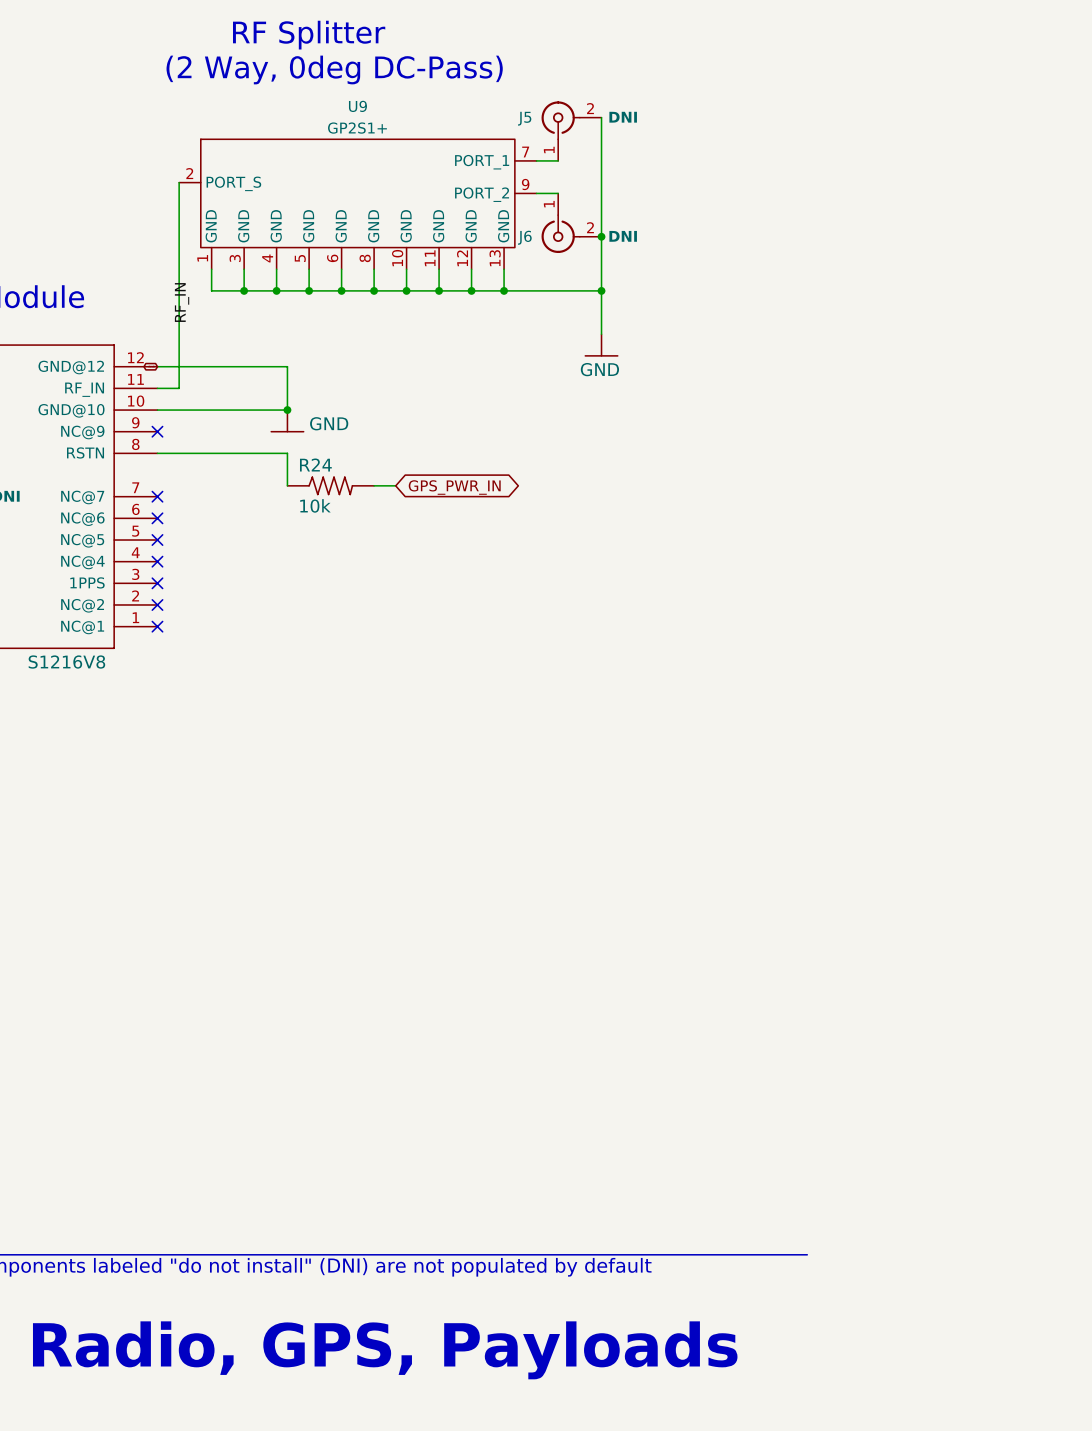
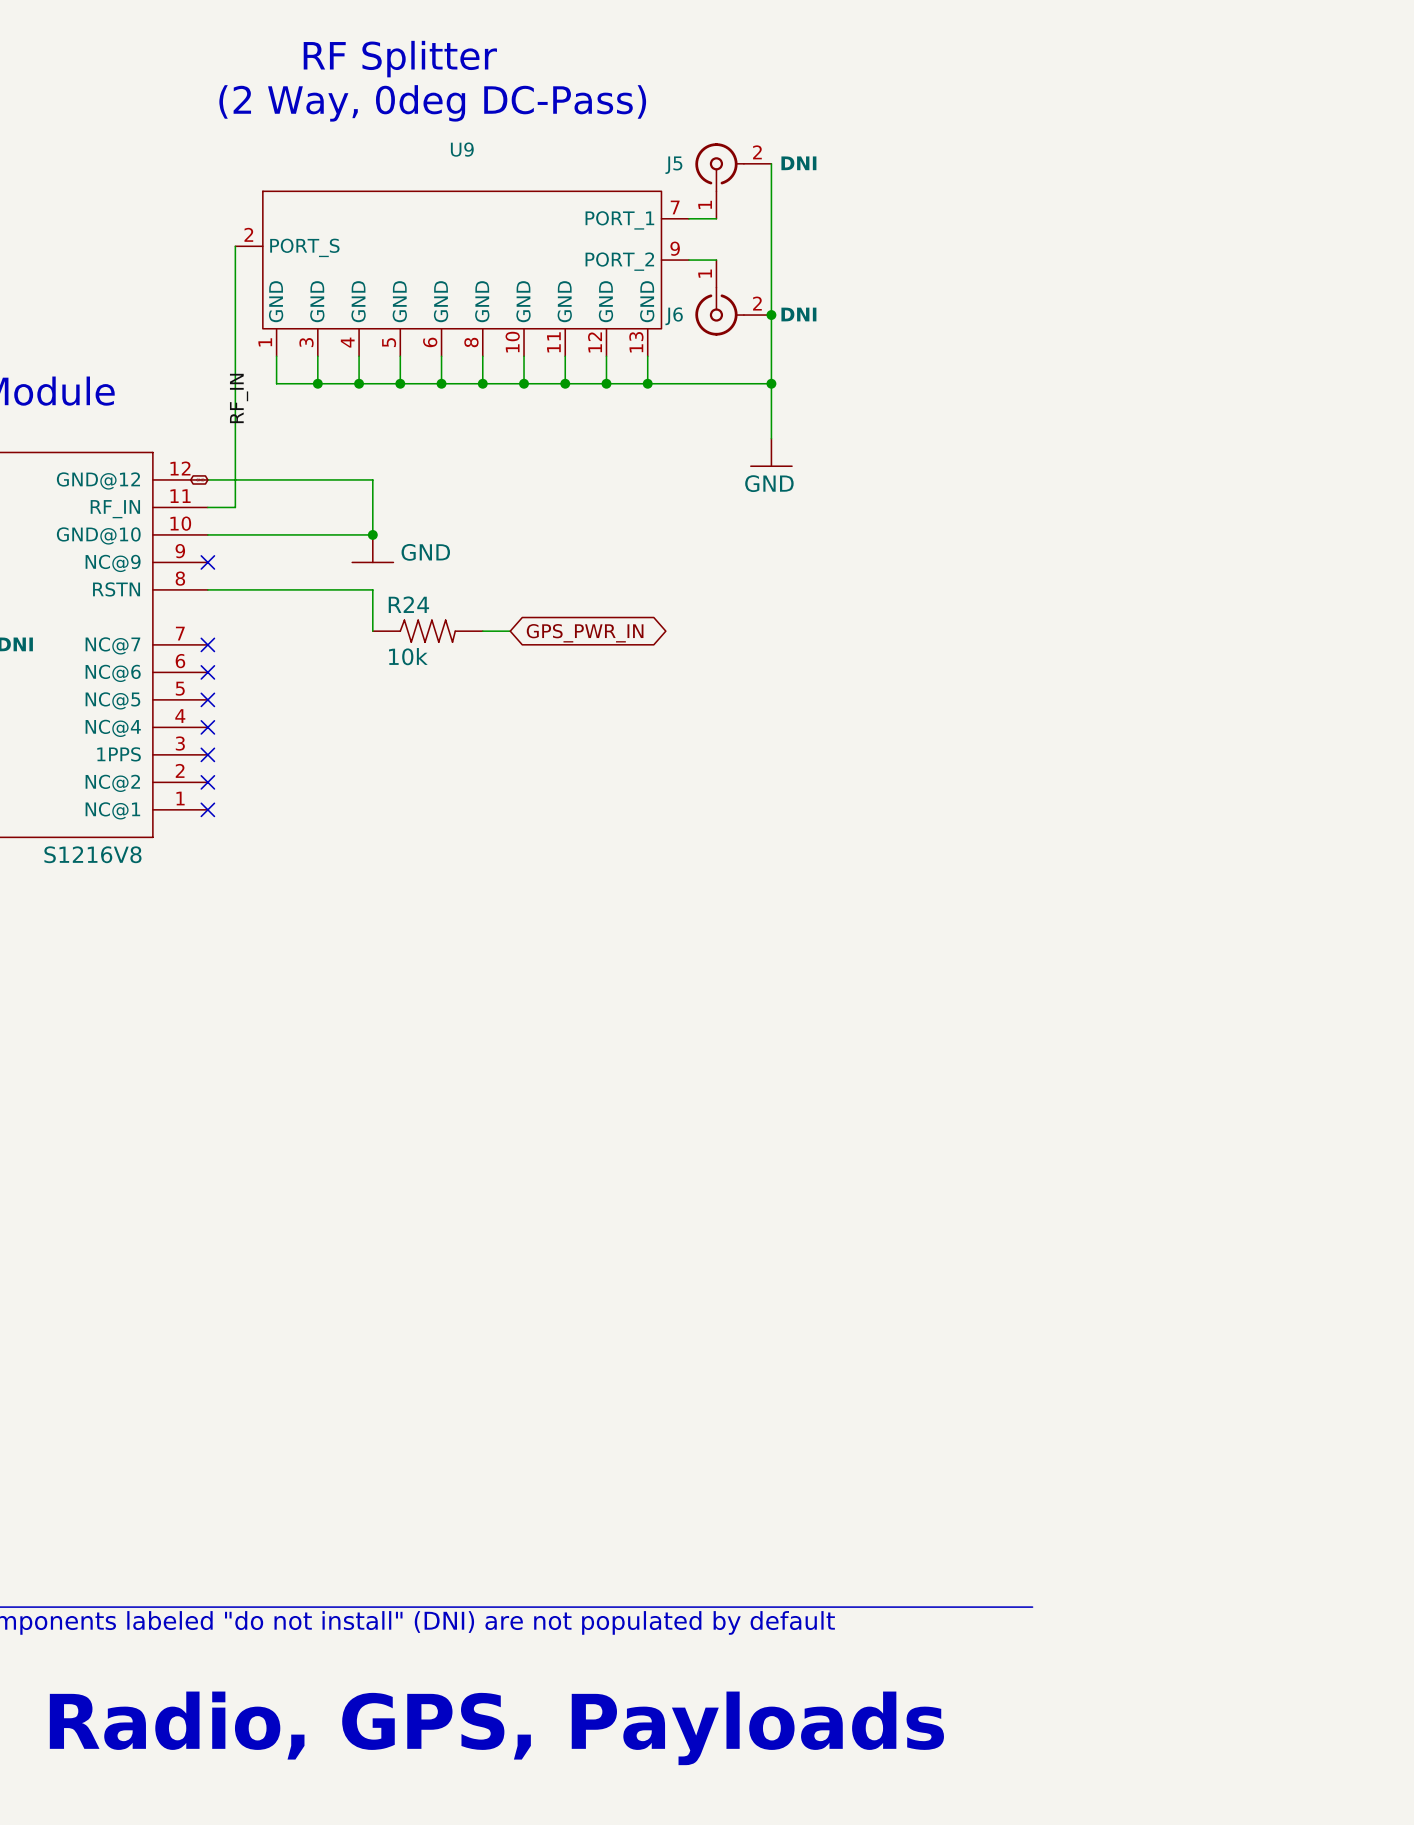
U9 value: GP2S1+ (357, 128) -> none

